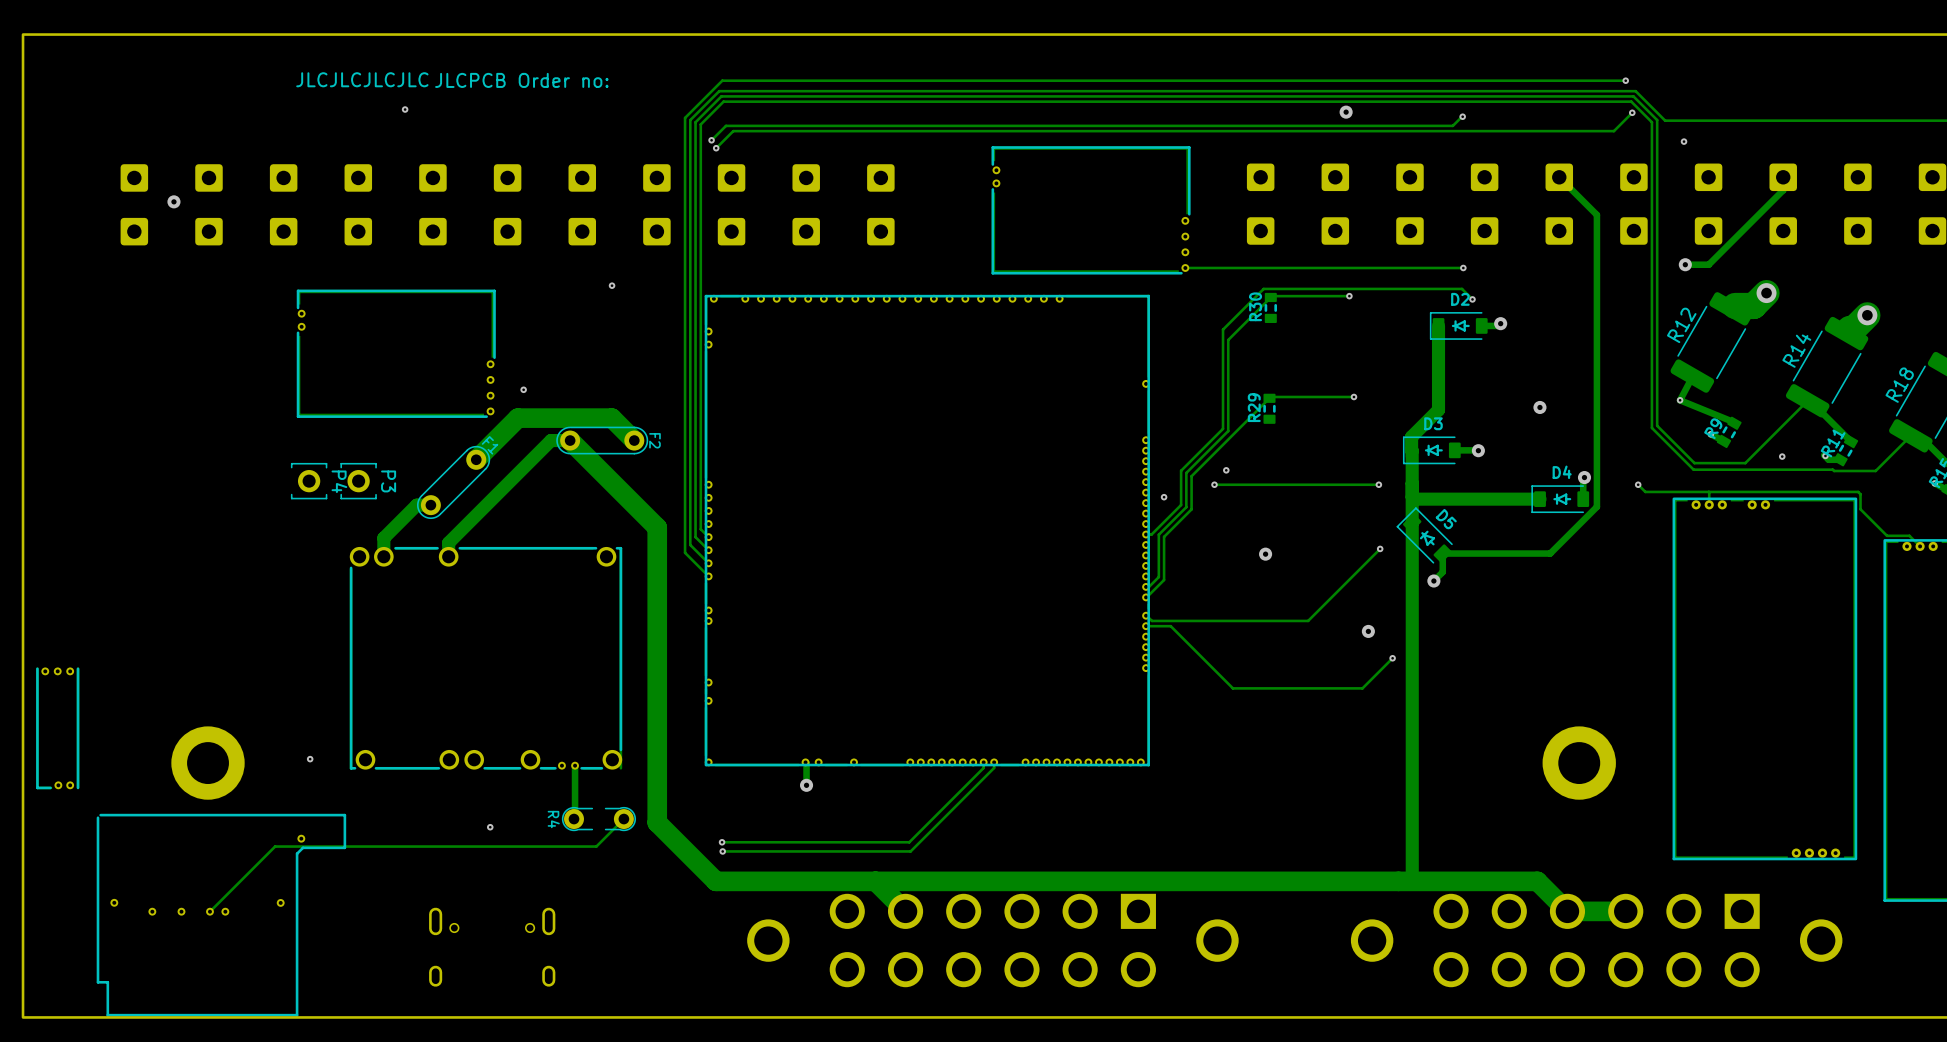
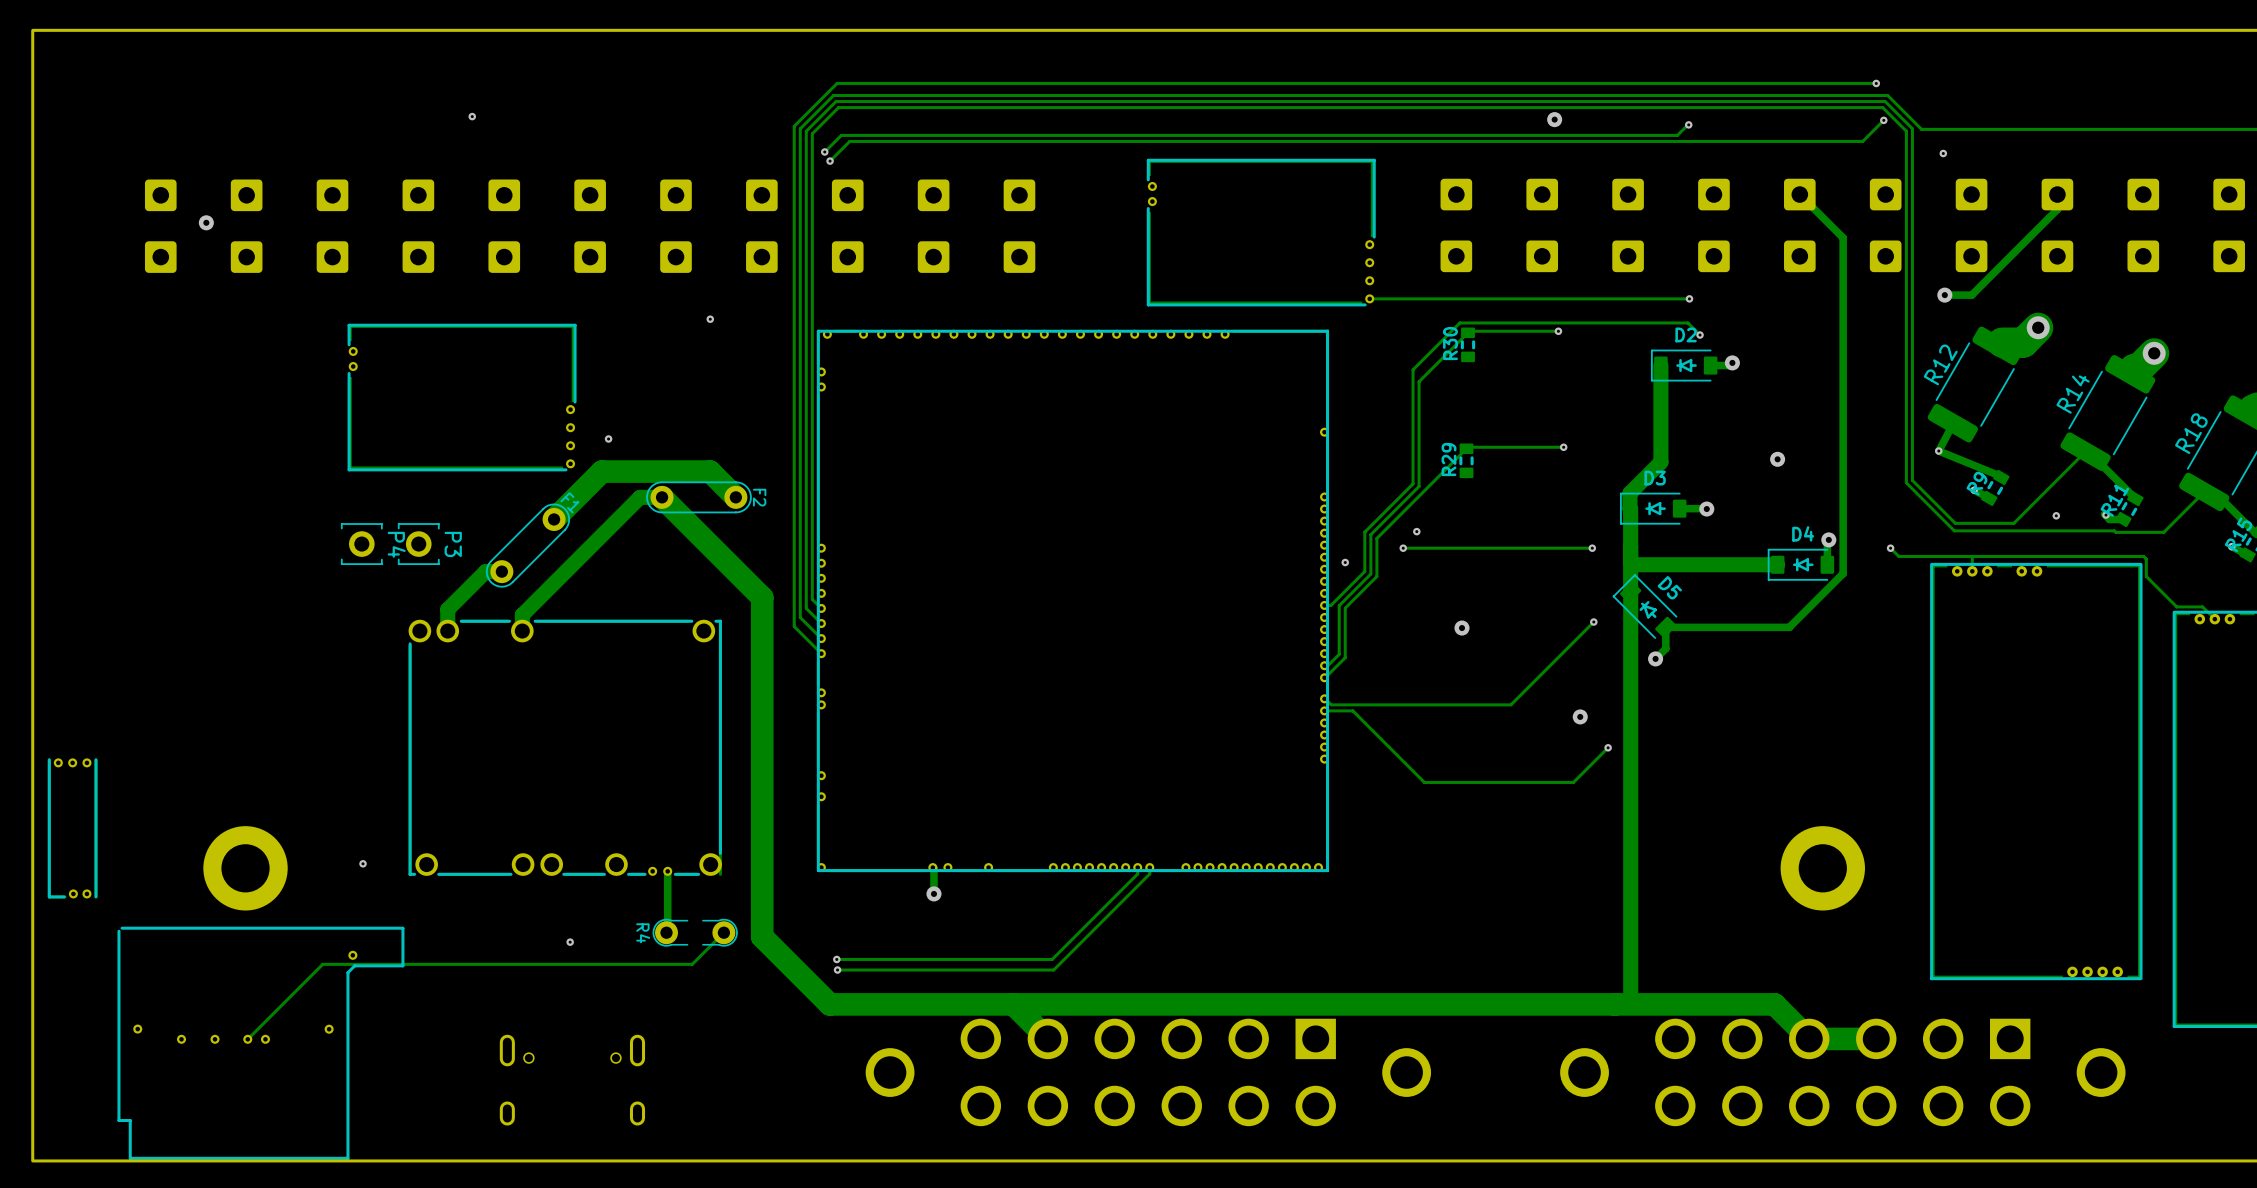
text: JLCJLCJLCJLC (362, 79) -> none
text: JLCPCB Order no: (521, 80) -> none

